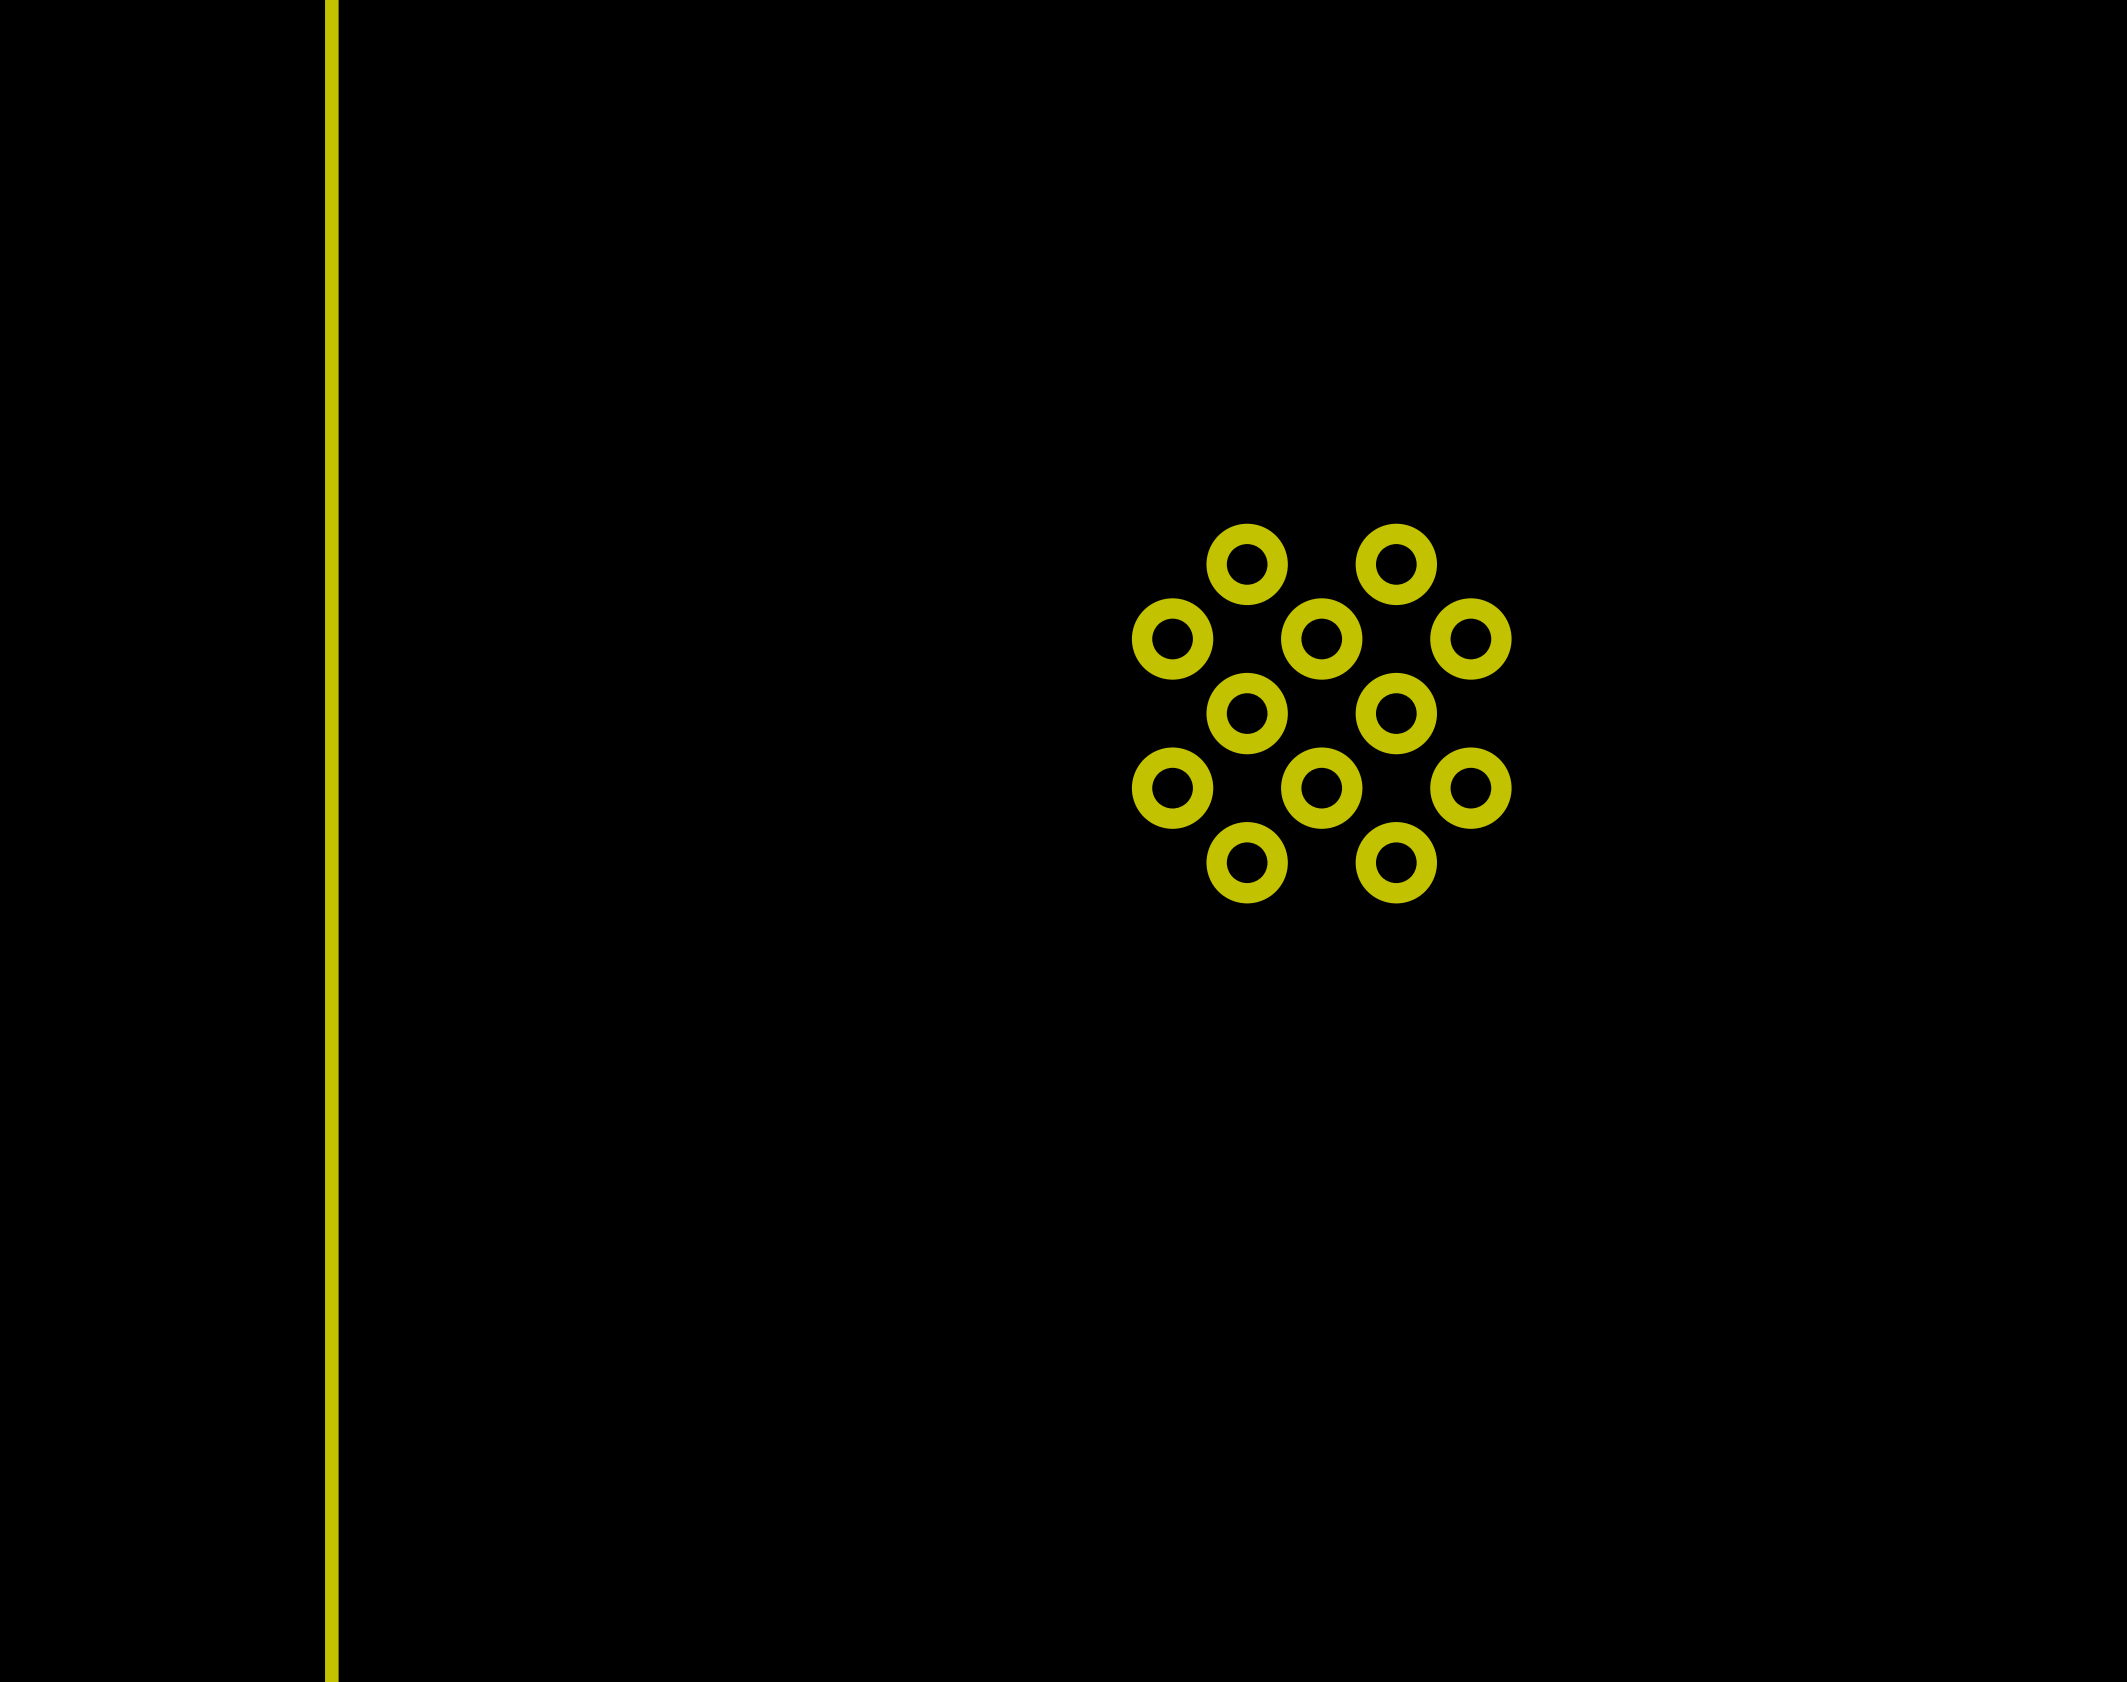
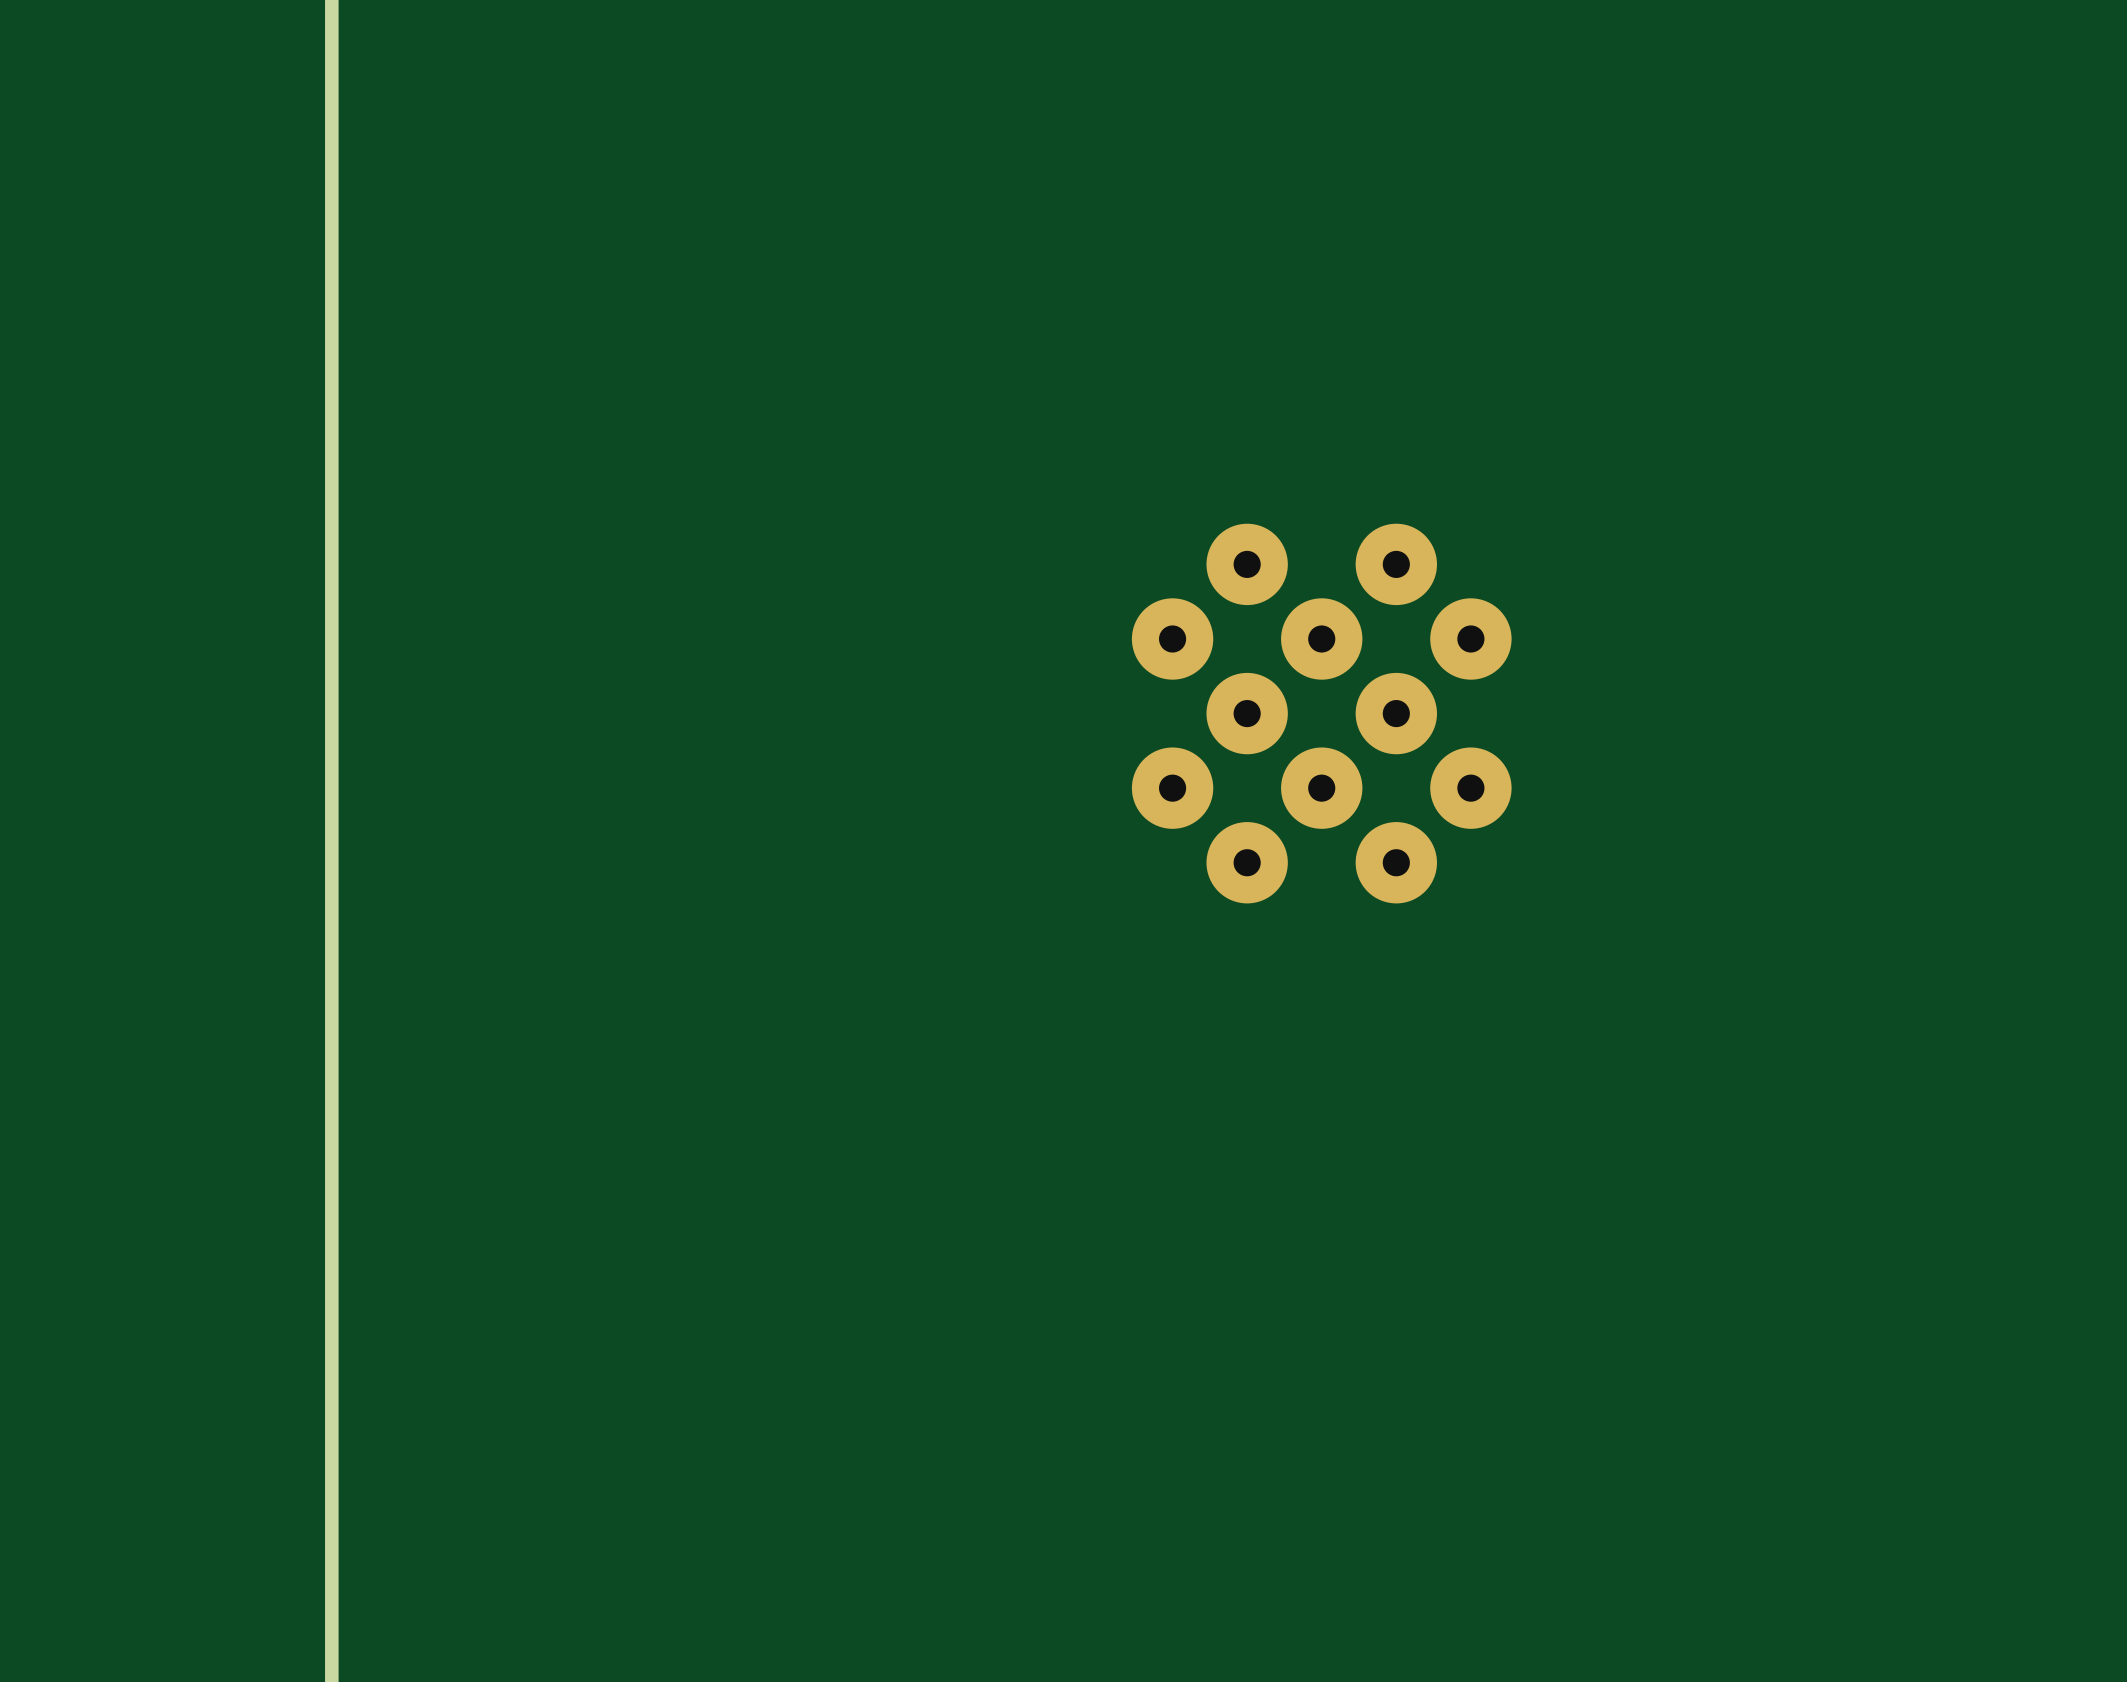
part footprint: [1131, 523, 1512, 904] -> [1131, 523, 1512, 904]

